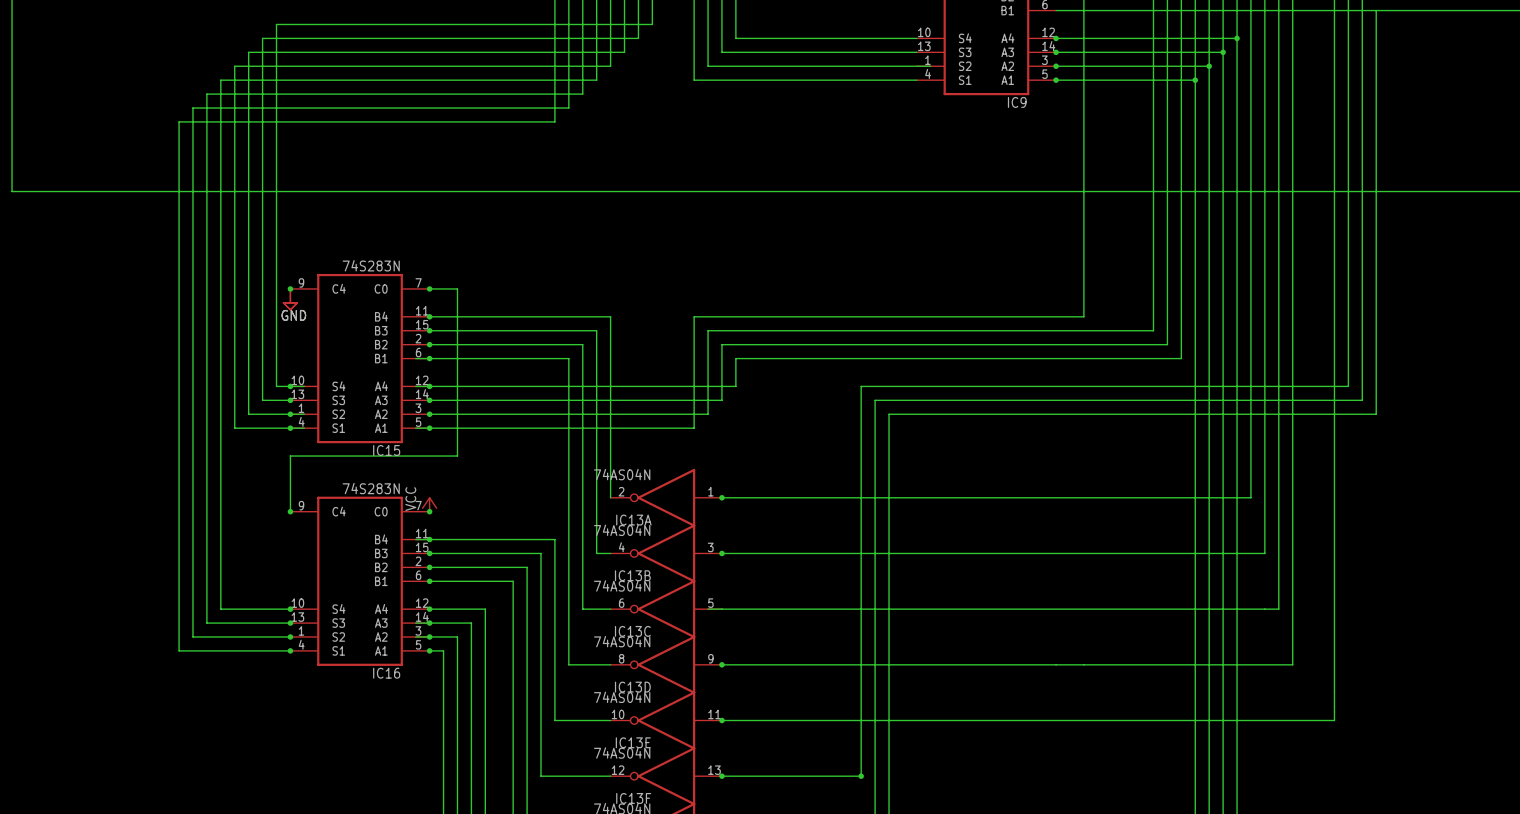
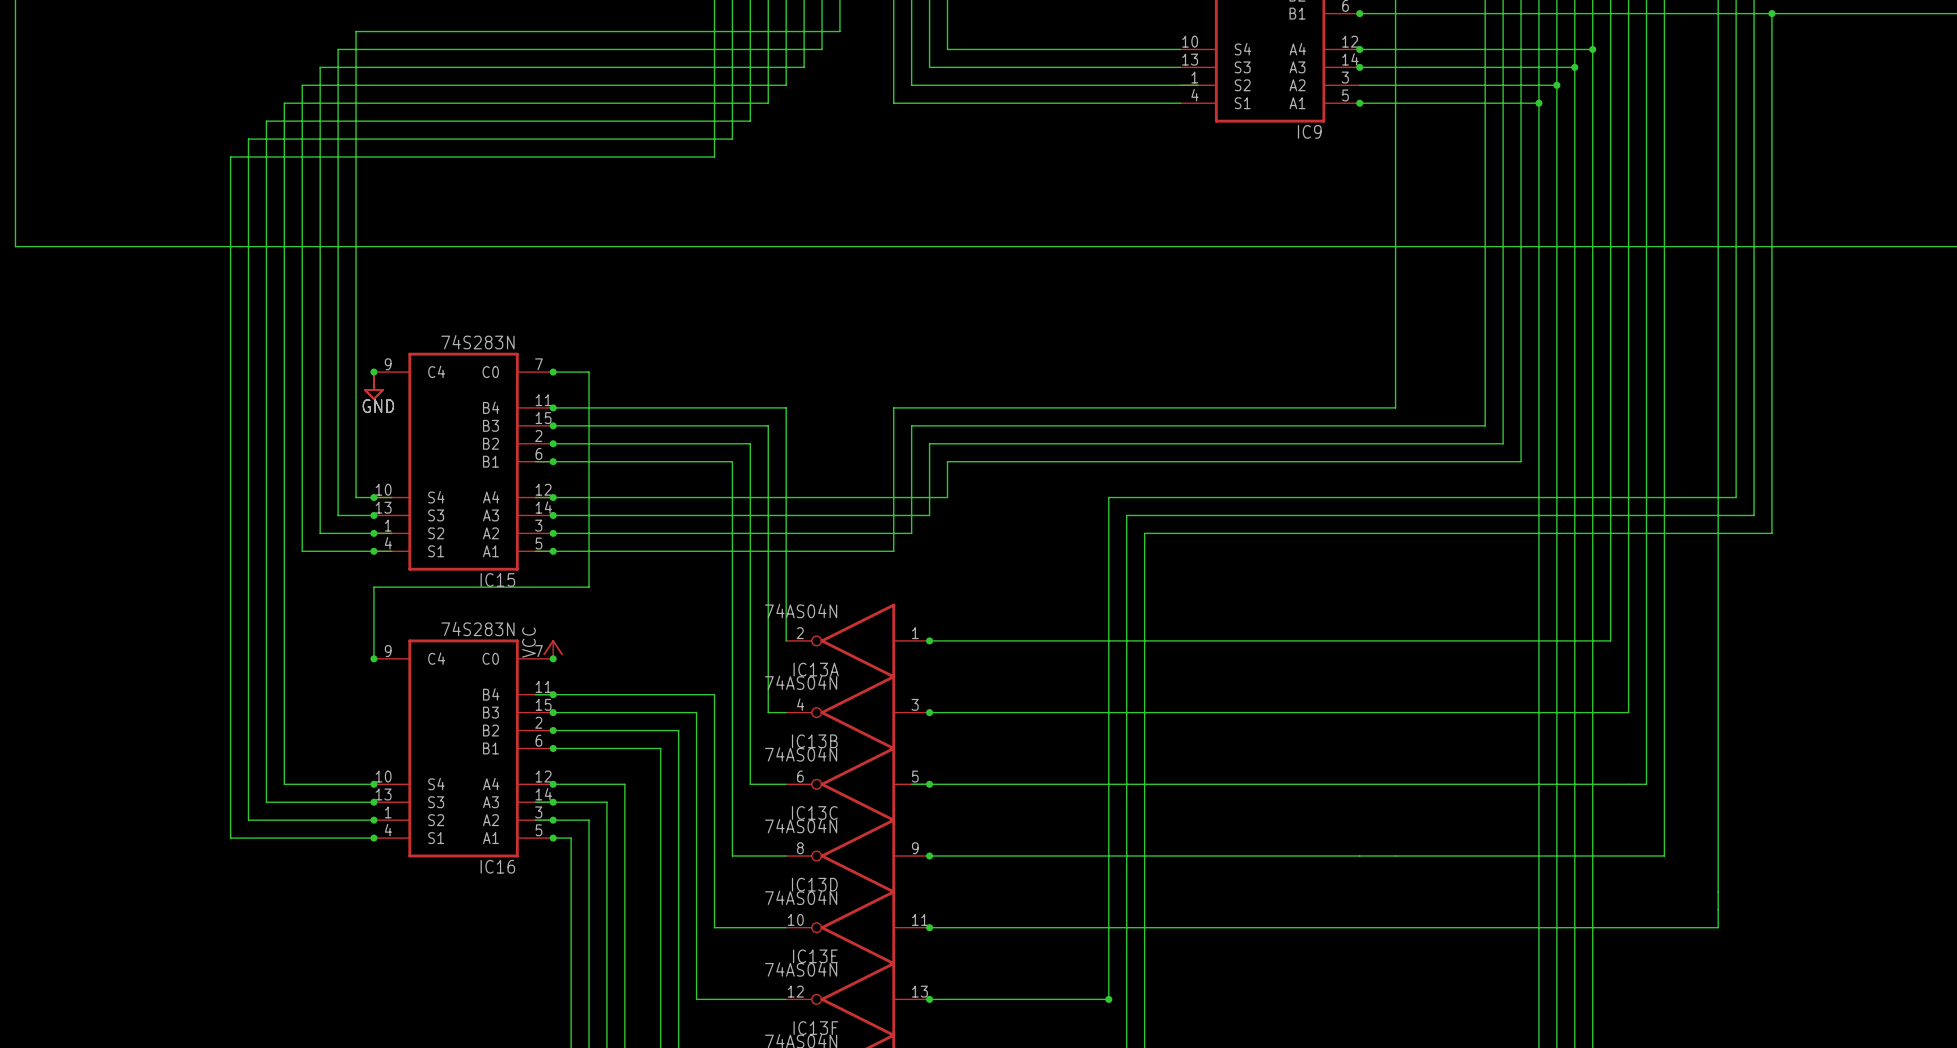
junction: none -> (1359, 13)
junction: none -> (1771, 13)
junction: (1056, 66) -> none
junction: none -> (929, 784)

